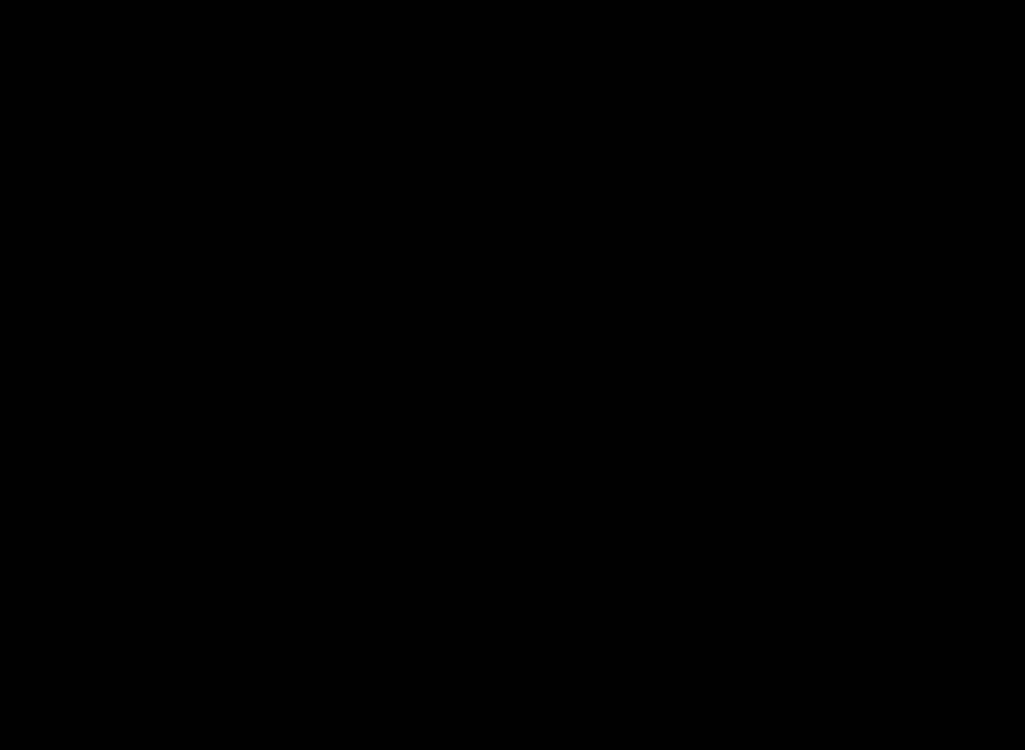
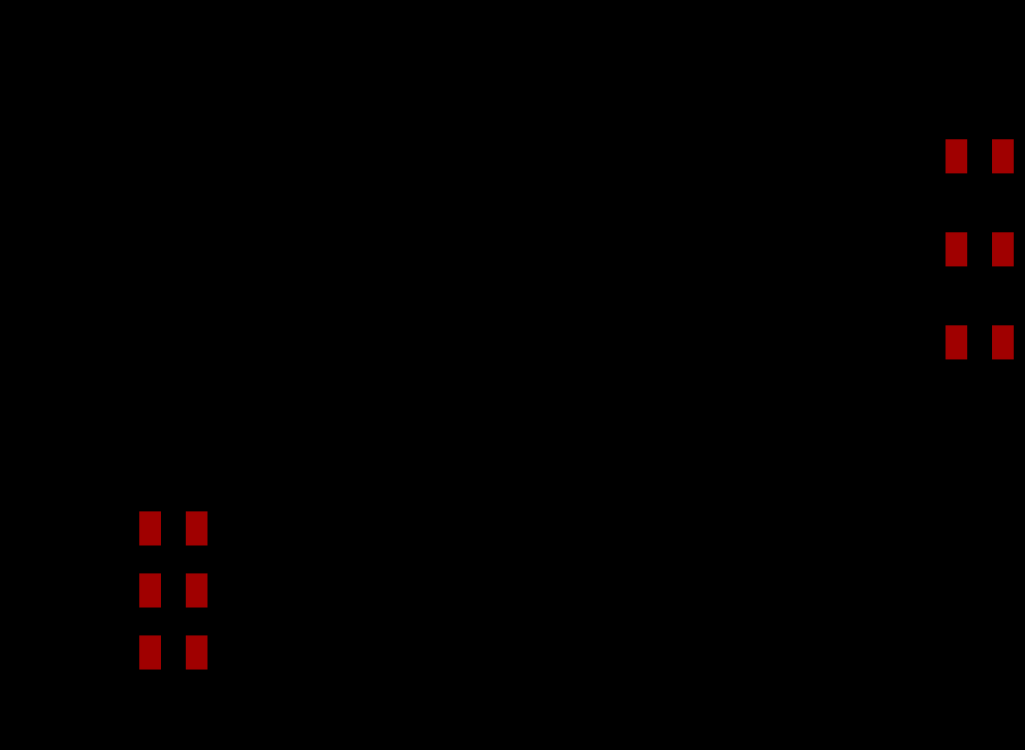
part: none -> (979, 156)
part: none -> (979, 249)
part: none -> (979, 342)
part: none -> (173, 528)
part: none -> (173, 590)
part: none -> (173, 652)

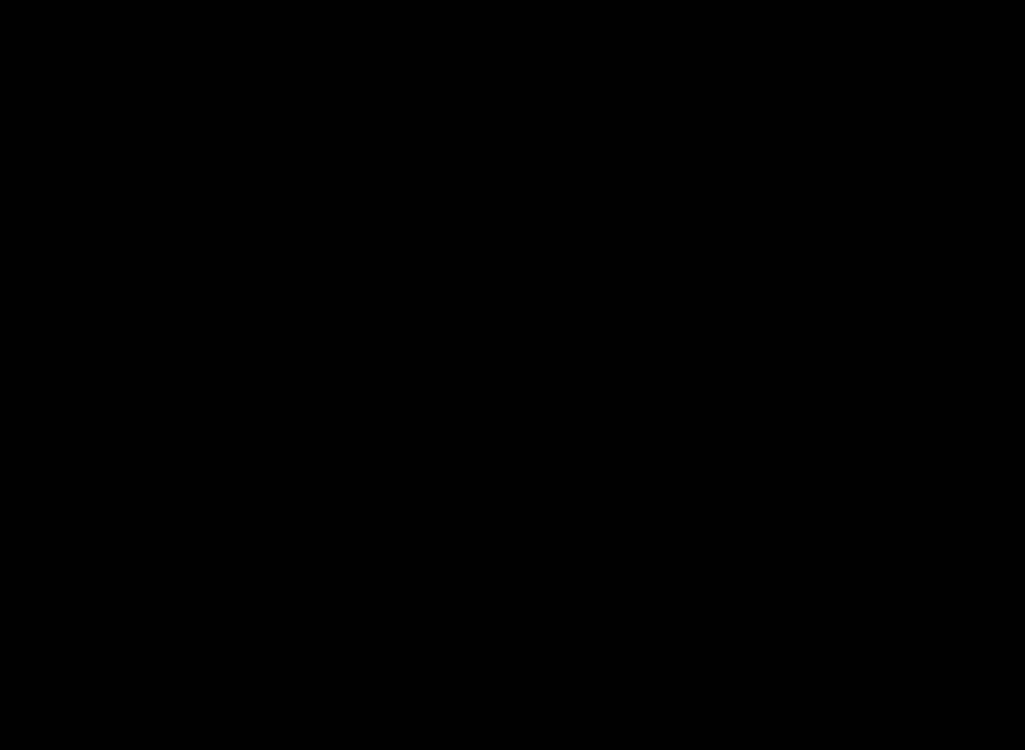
part: (979, 156) -> none
part: (979, 249) -> none
part: (979, 342) -> none
part: (173, 528) -> none
part: (173, 590) -> none
part: (173, 652) -> none

